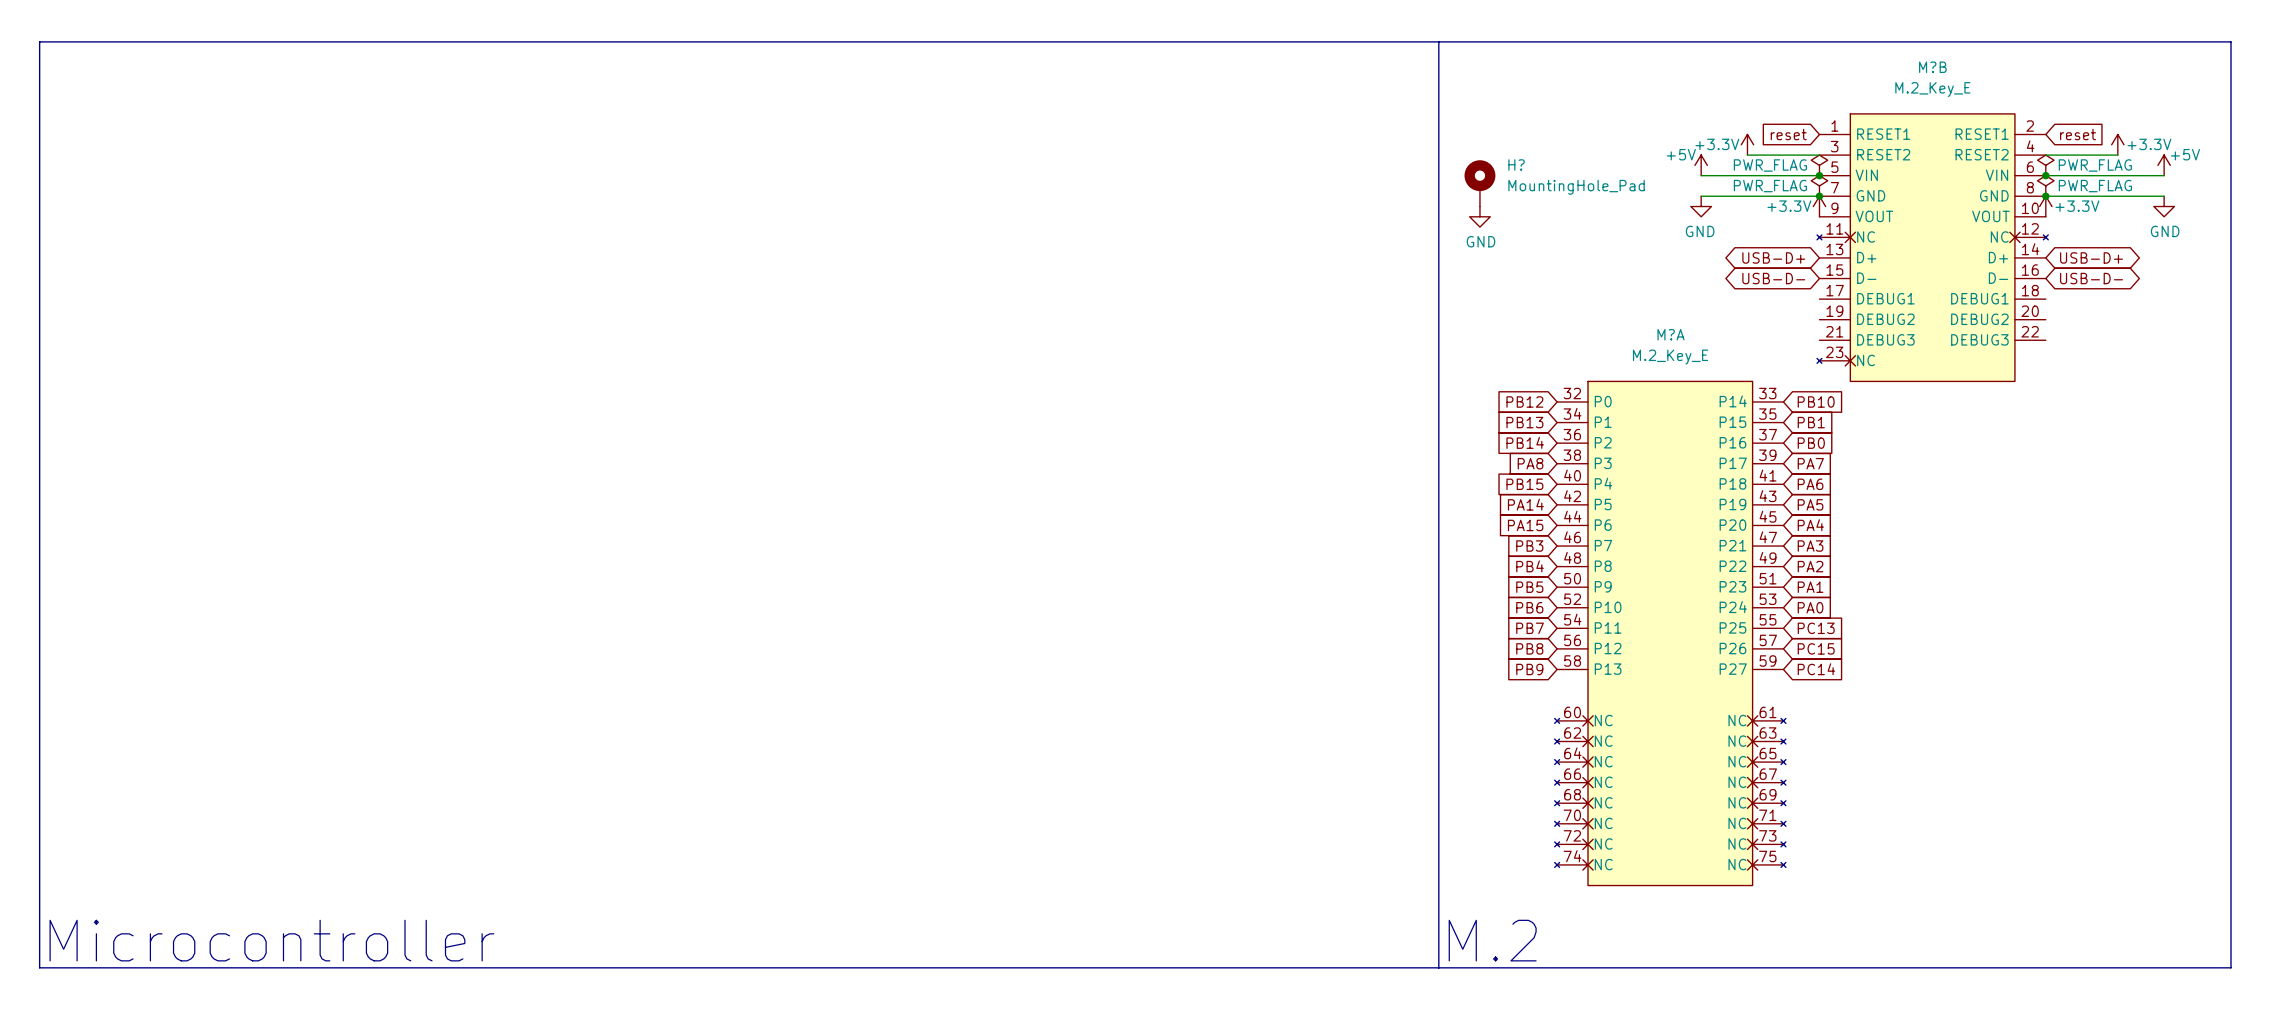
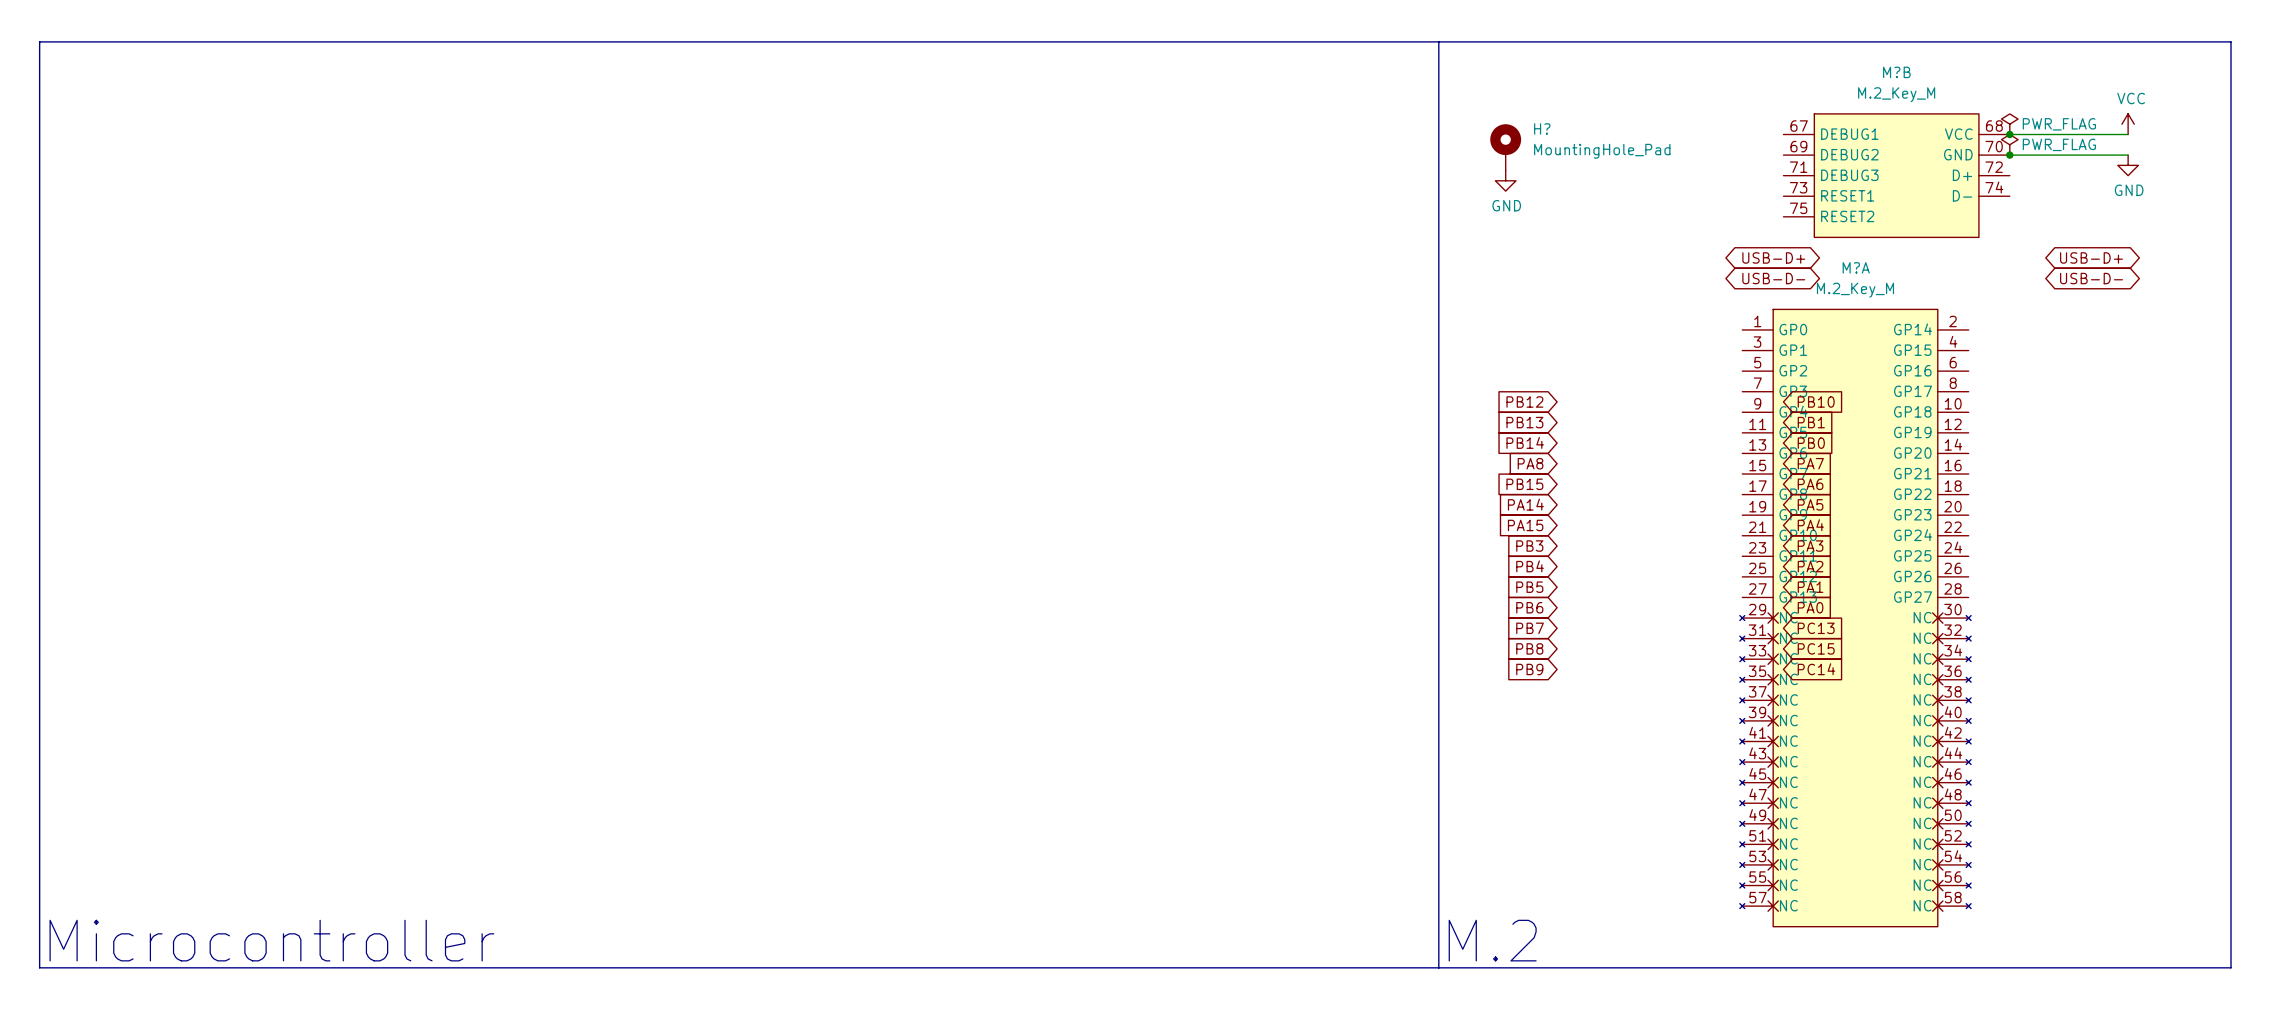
power symbol: none -> PWR_FLAG (2009, 124)
power symbol: none -> VCC (2128, 124)
global label: reset (1788, 134) -> none
junction: none -> (2009, 134)
global label: reset (2078, 134) -> none
power symbol: +3.3V (1747, 144) -> none
power symbol: none -> PWR_FLAG (2009, 144)
power symbol: +3.3V (2117, 144) -> none
wire: (1747, 155) (1819, 155) -> none
junction: none -> (2009, 155)
wire: none -> (2117, 155) (2128, 155)
power symbol: +5V (1701, 165) -> none
power symbol: PWR_FLAG (1819, 165) -> none
power symbol: PWR_FLAG (2045, 165) -> none
power symbol: +5V (2164, 165) -> none
wire: (1701, 175) (1819, 175) -> none
junction: (1819, 175) -> none
M?B: none -> M.2_Key_M (1896, 175)
wire: (2045, 175) (2164, 175) -> (2009, 134) (2128, 134)
junction: (2045, 175) -> none
H? position: (1479, 183) -> (1505, 147)
power symbol: PWR_FLAG (1819, 185) -> none
power symbol: PWR_FLAG (2045, 185) -> none
wire: (1701, 196) (1819, 196) -> none
junction: (1819, 196) -> none
wire: (2045, 196) (2164, 196) -> none
junction: (2045, 196) -> none
power symbol: GND (1701, 206) -> none
power symbol: +3.3V (1819, 206) -> none
power symbol: +3.3V (2045, 206) -> none
power symbol position: GND (2164, 206) -> GND (2128, 165)
power symbol position: GND (1479, 216) -> GND (1505, 180)
M?B: M.2_Key_E (1932, 247) -> none
M?A: none -> M.2_Key_M (1855, 618)
M?A: M.2_Key_E (1670, 633) -> none

